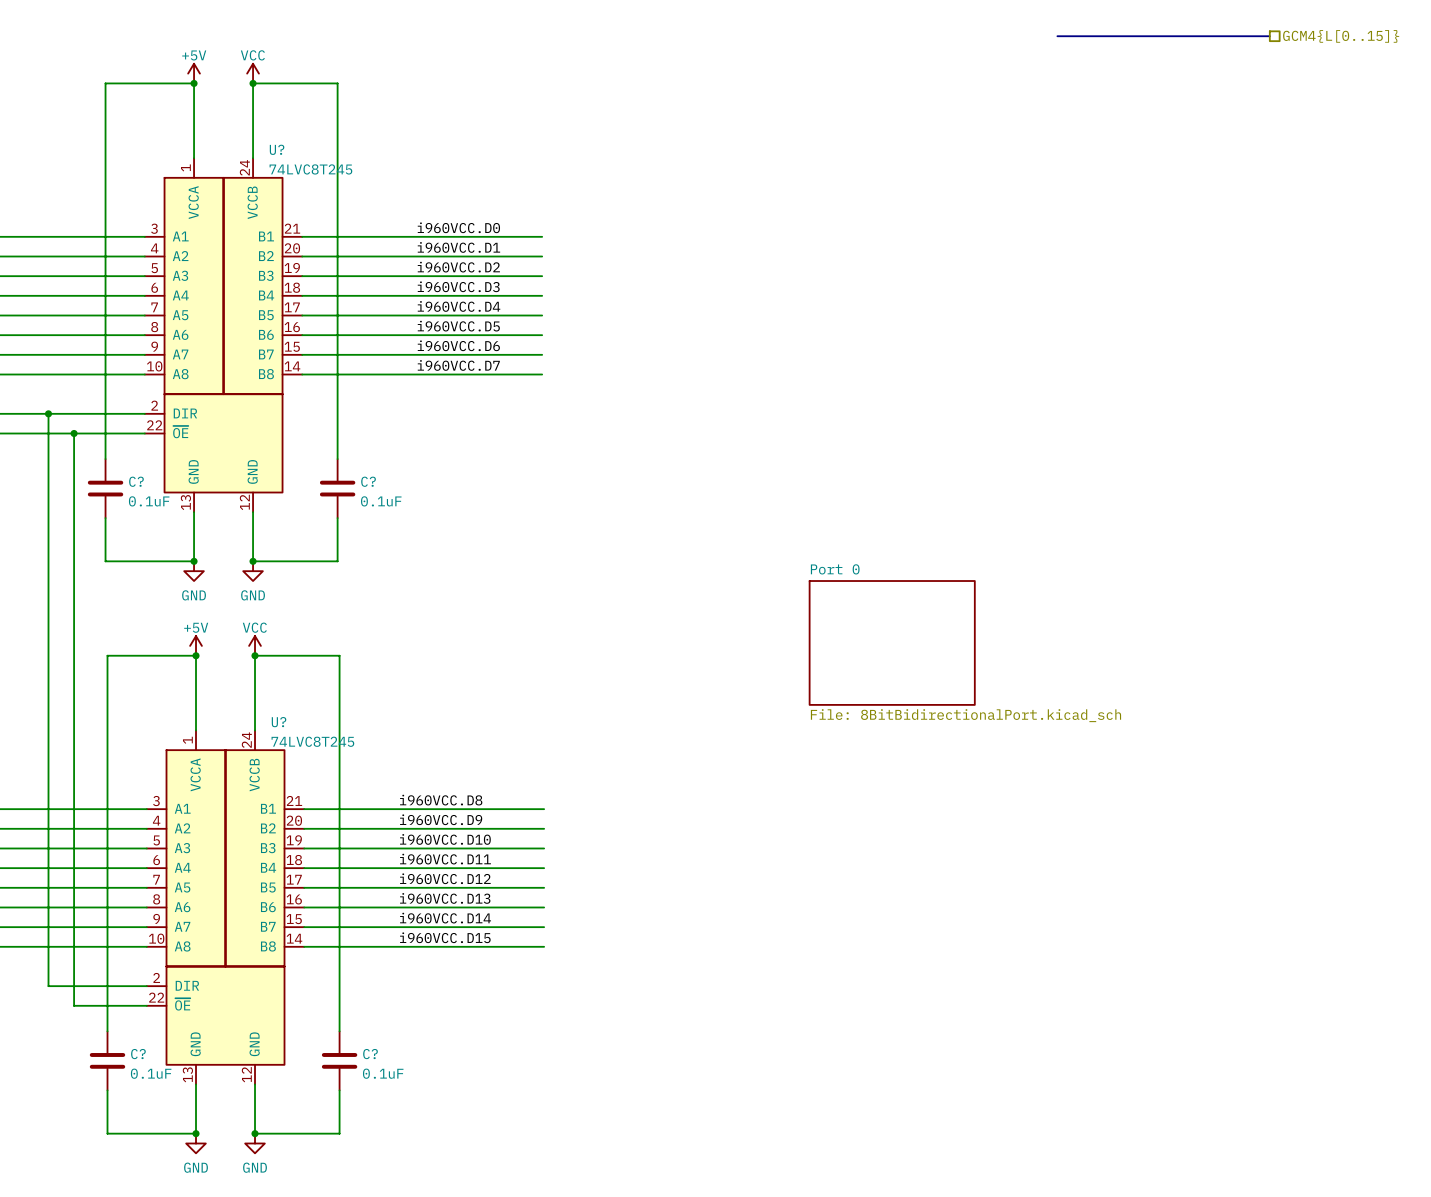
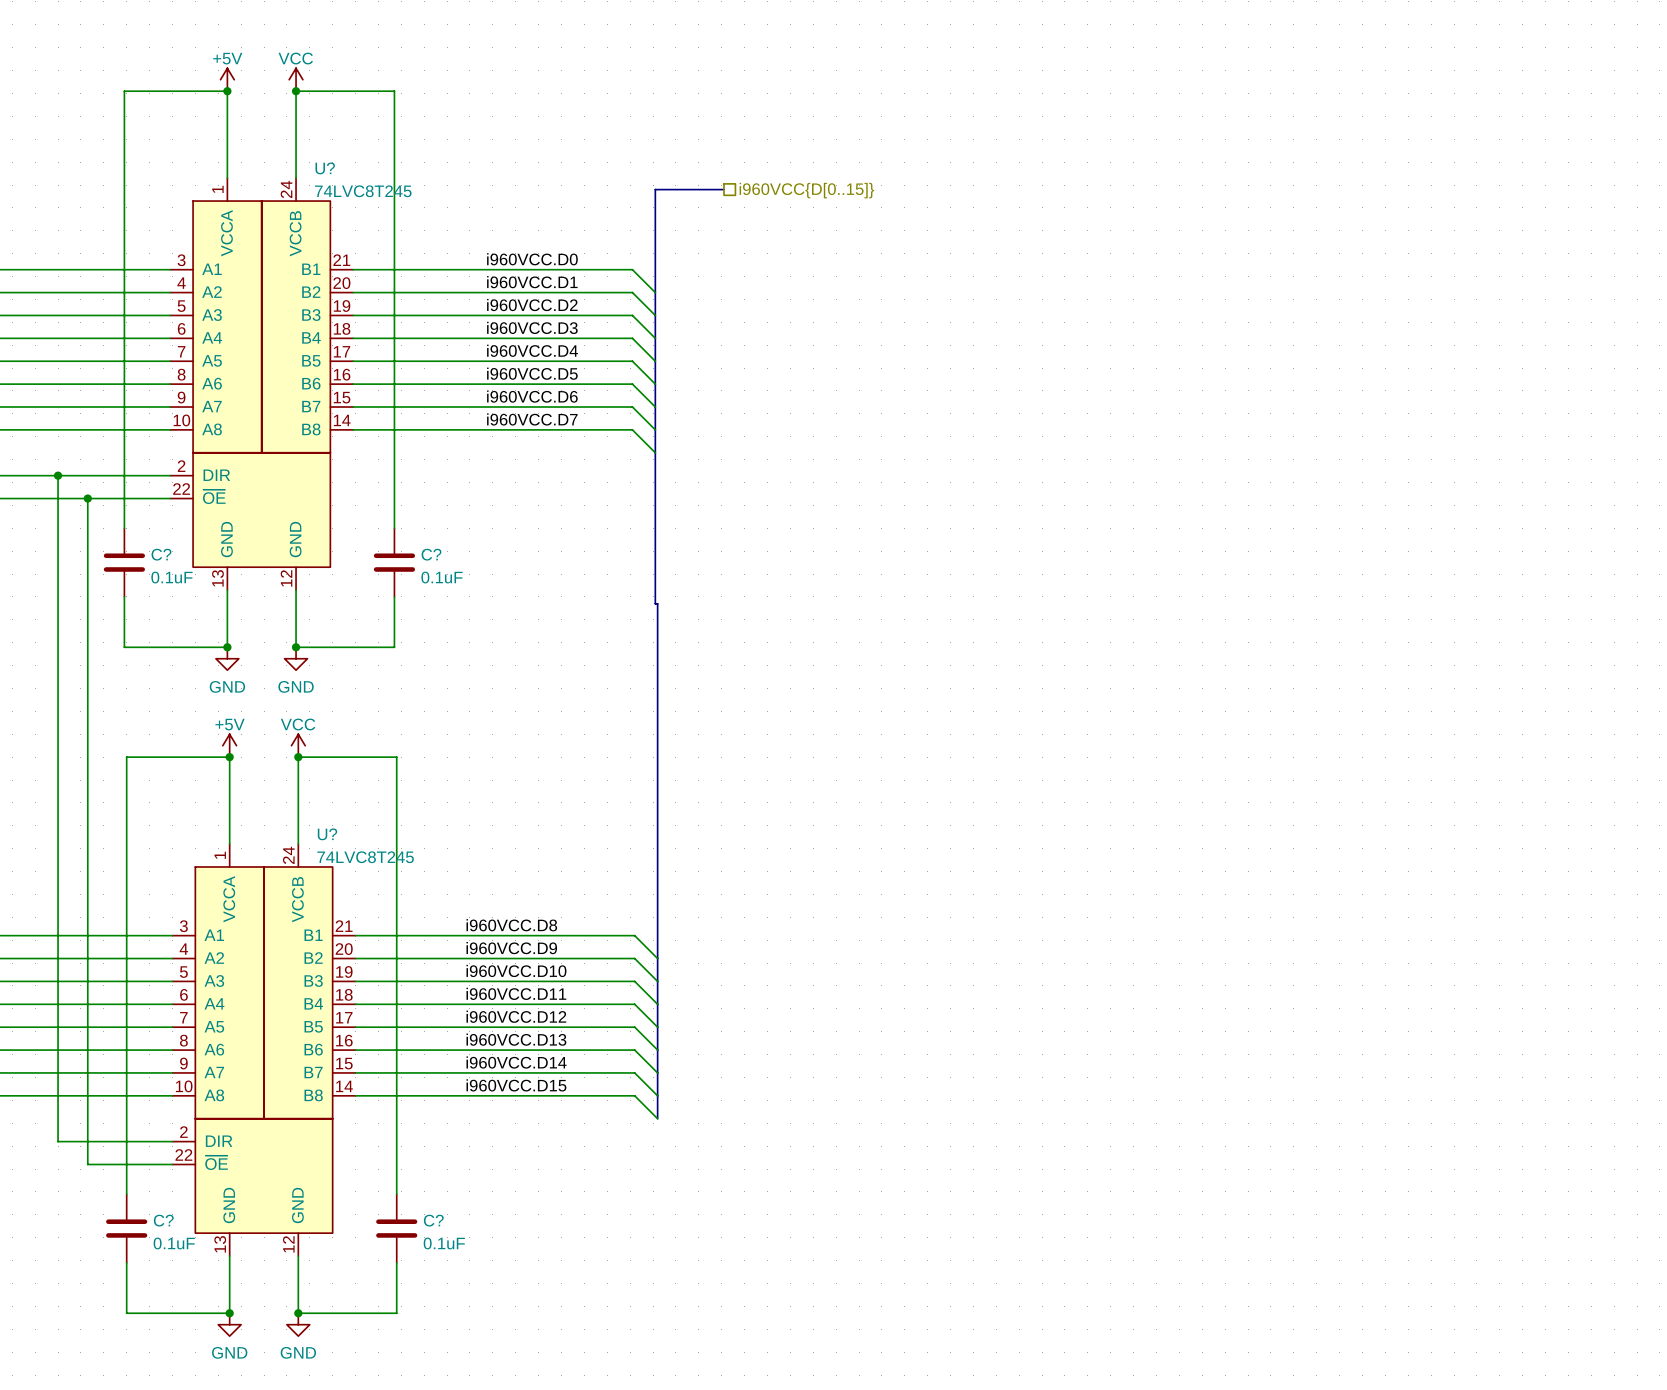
bus: (1057, 36) (1269, 36) -> none
hierarchical label: GCM4{L[0..15]} (1341, 36) -> none
bus: none -> (723, 189) (655, 189) (657, 1118)
hierarchical label: none -> i960VCC{D[0..15]} (806, 190)
wire: none -> (632, 269) (655, 292)
wire: none -> (632, 292) (655, 315)
wire: none -> (632, 315) (655, 338)
wire: none -> (632, 338) (655, 361)
wire: none -> (632, 361) (655, 384)
wire: none -> (632, 384) (655, 407)
wire: none -> (632, 407) (655, 429)
wire: none -> (632, 429) (655, 452)
sheet Port 0: File: 8BitBidirectionalPort.kicad_sch (892, 642) -> none
wire: none -> (634, 935) (657, 958)
wire: none -> (634, 958) (657, 981)
wire: none -> (634, 981) (657, 1004)
wire: none -> (634, 1004) (657, 1027)
wire: none -> (634, 1027) (657, 1050)
wire: none -> (634, 1050) (657, 1072)
wire: none -> (634, 1072) (657, 1095)
wire: none -> (634, 1095) (657, 1118)

